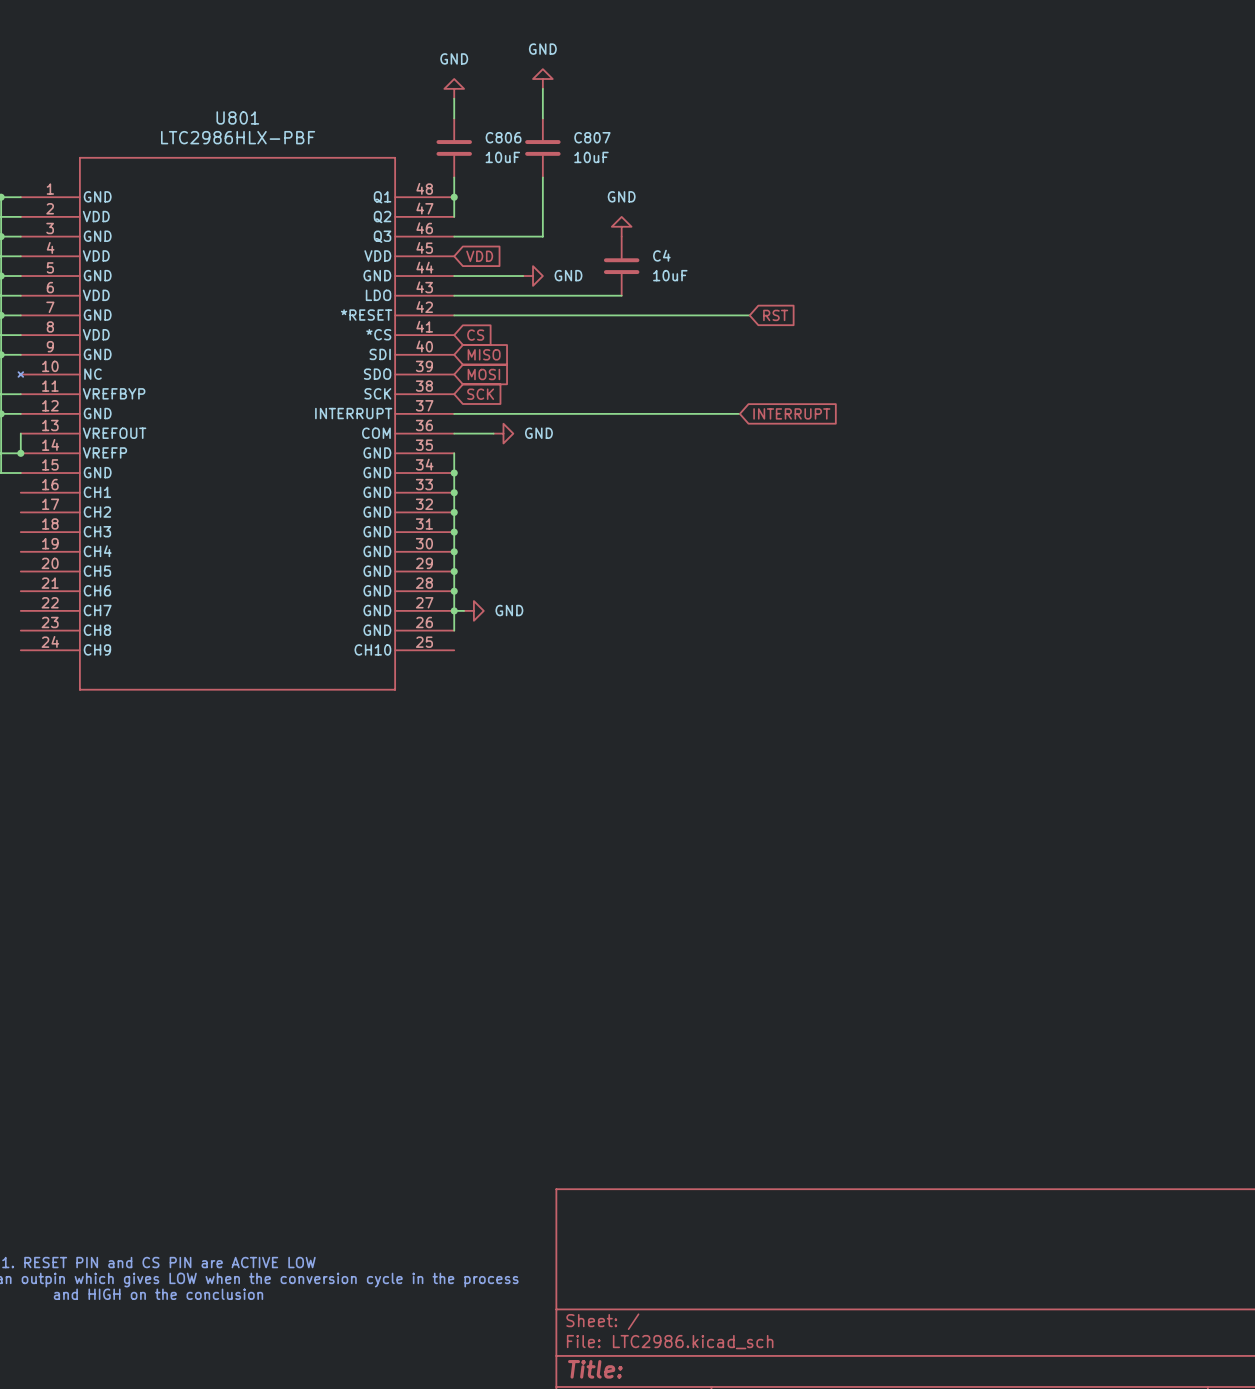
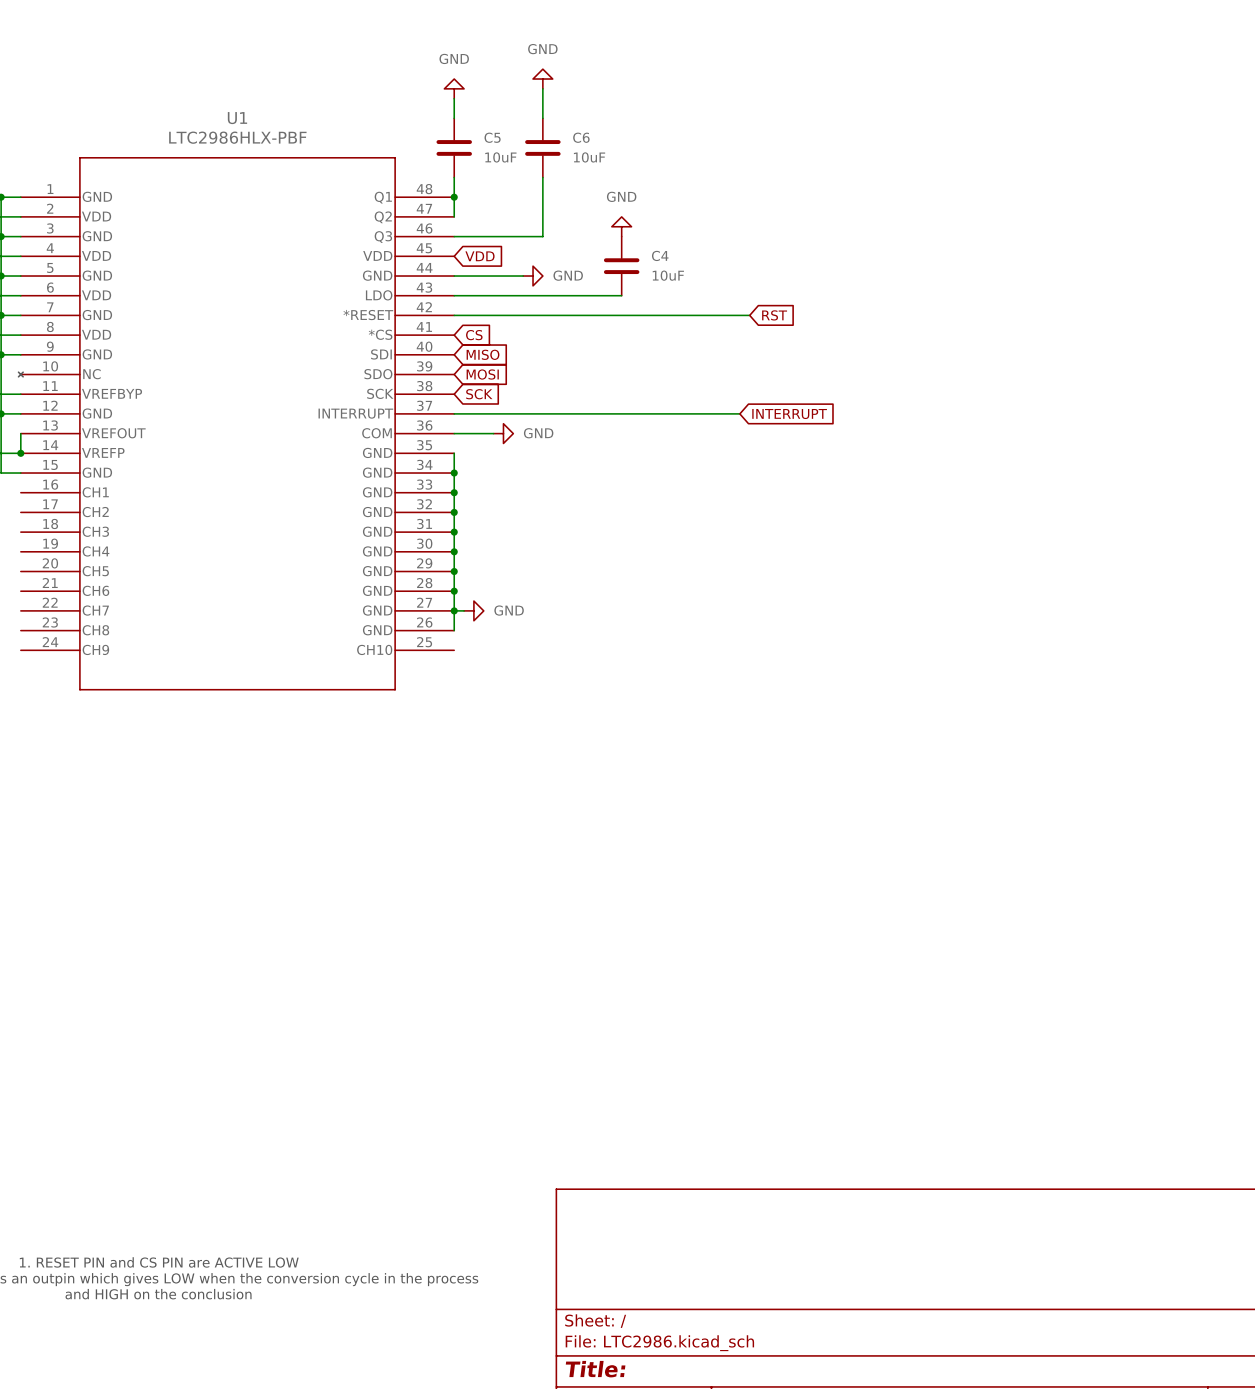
U801 name: U801 (237, 117) -> U1 (237, 118)
C806 name: C806 (503, 137) -> C5 (492, 137)
C807 name: C807 (592, 137) -> C6 (581, 137)

